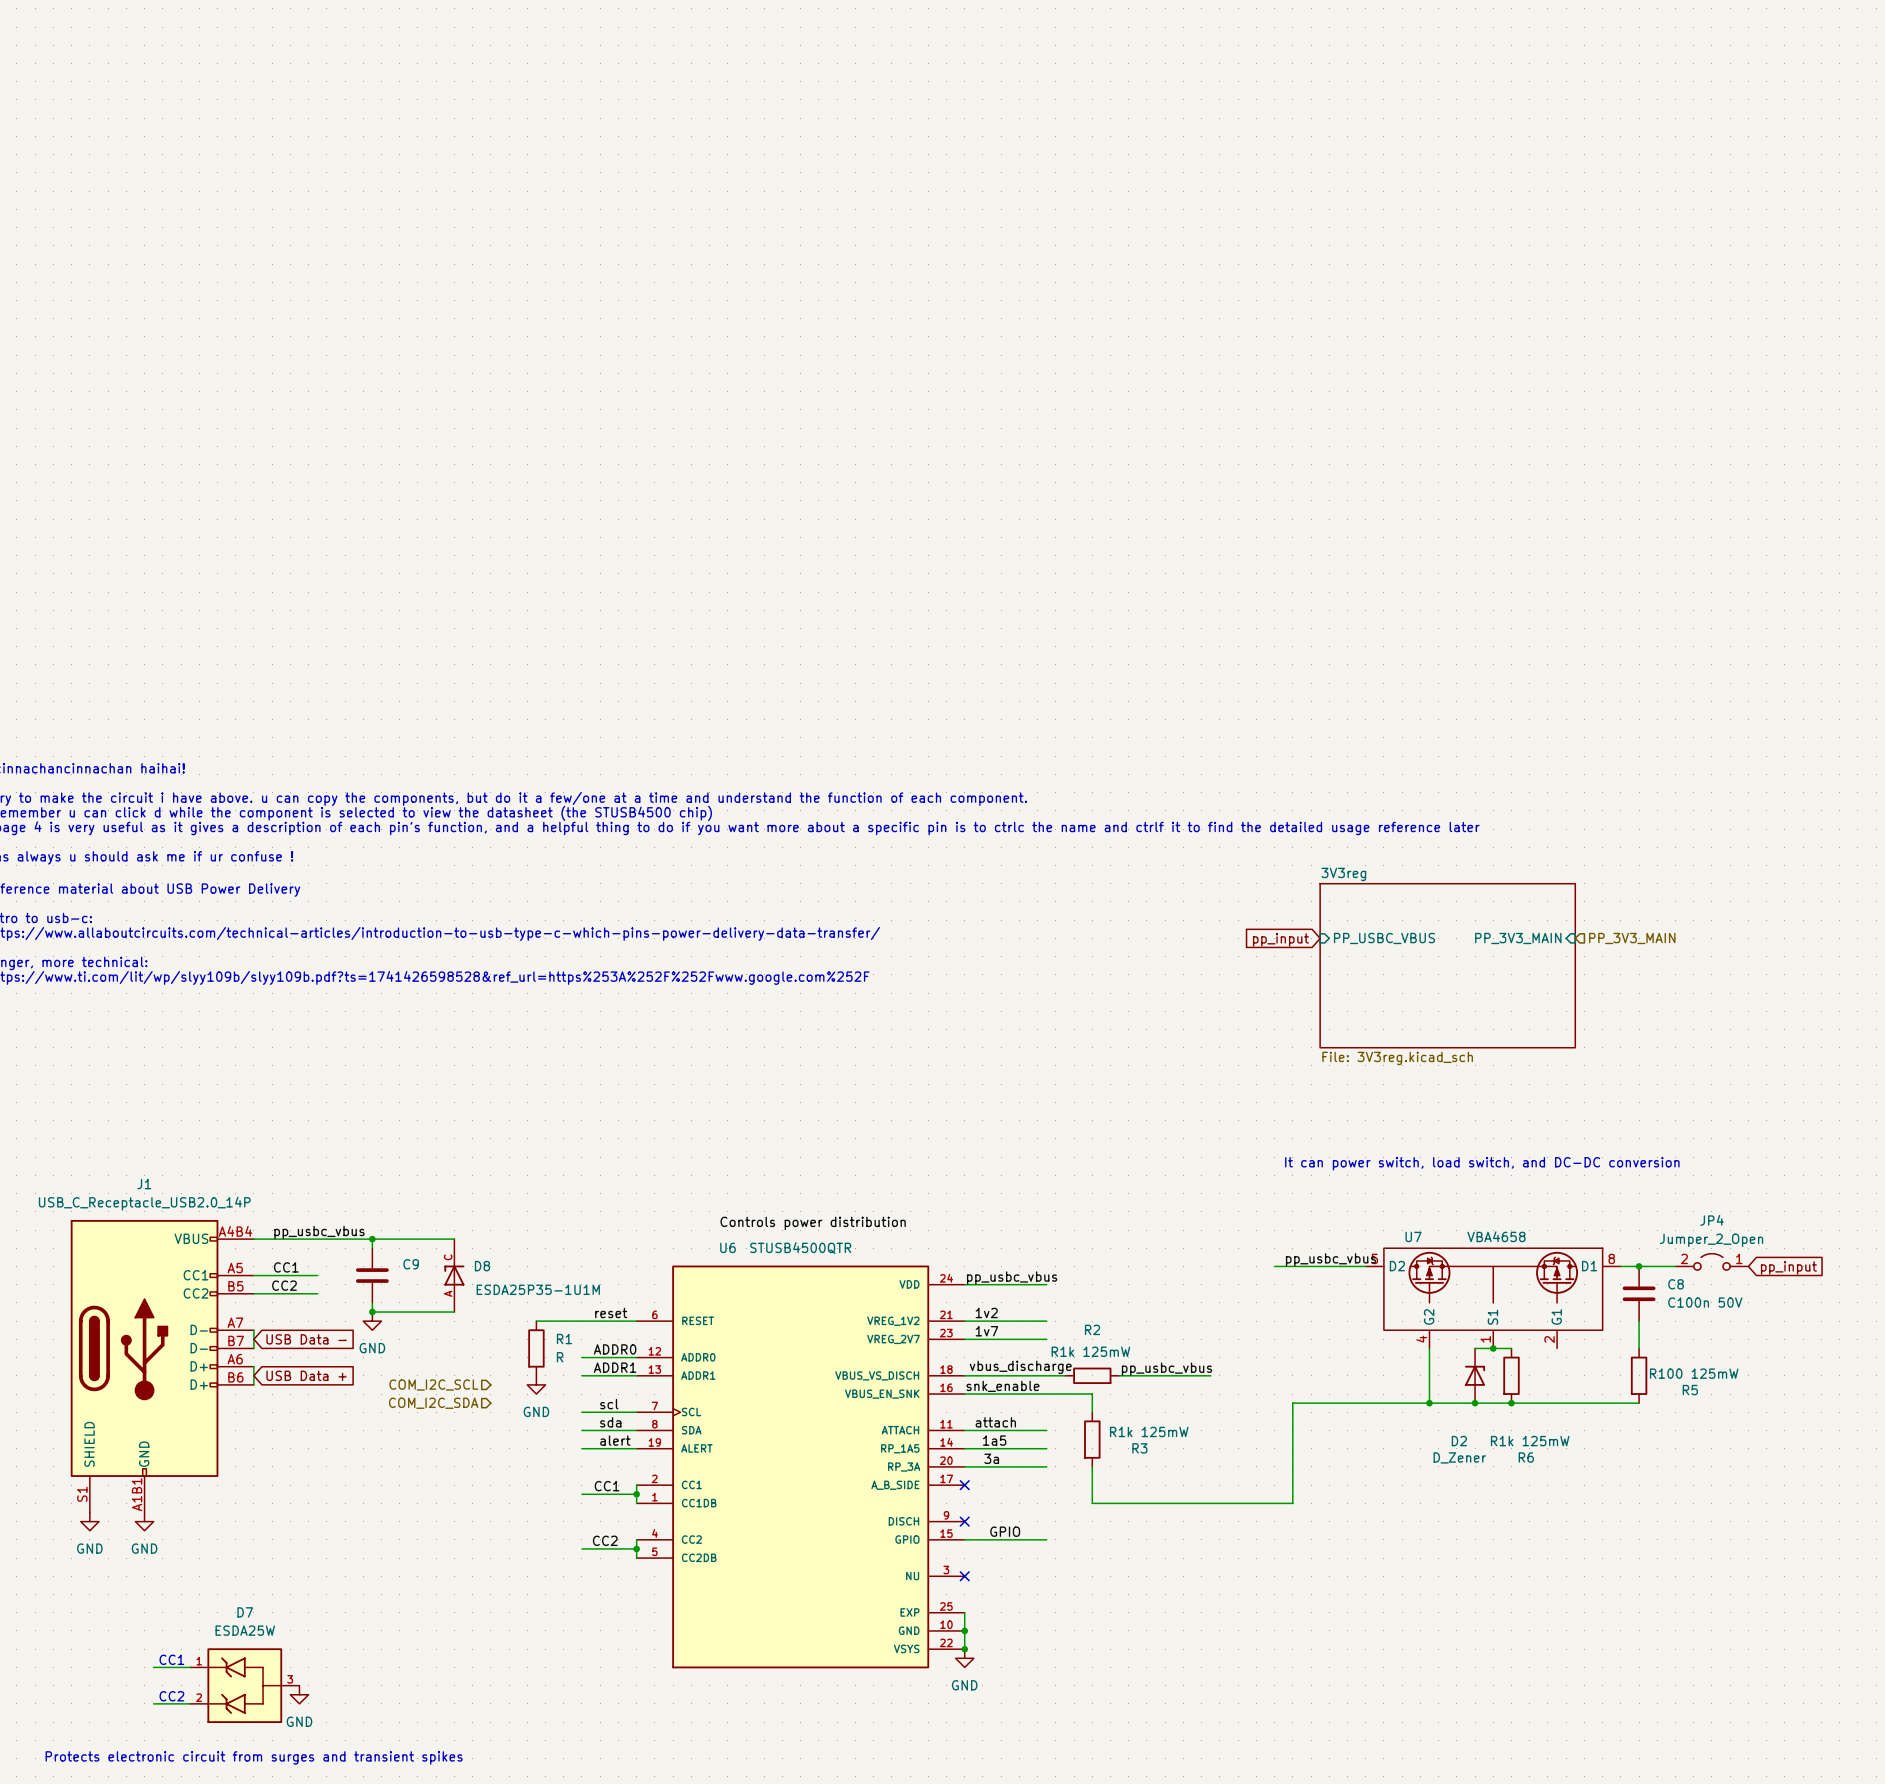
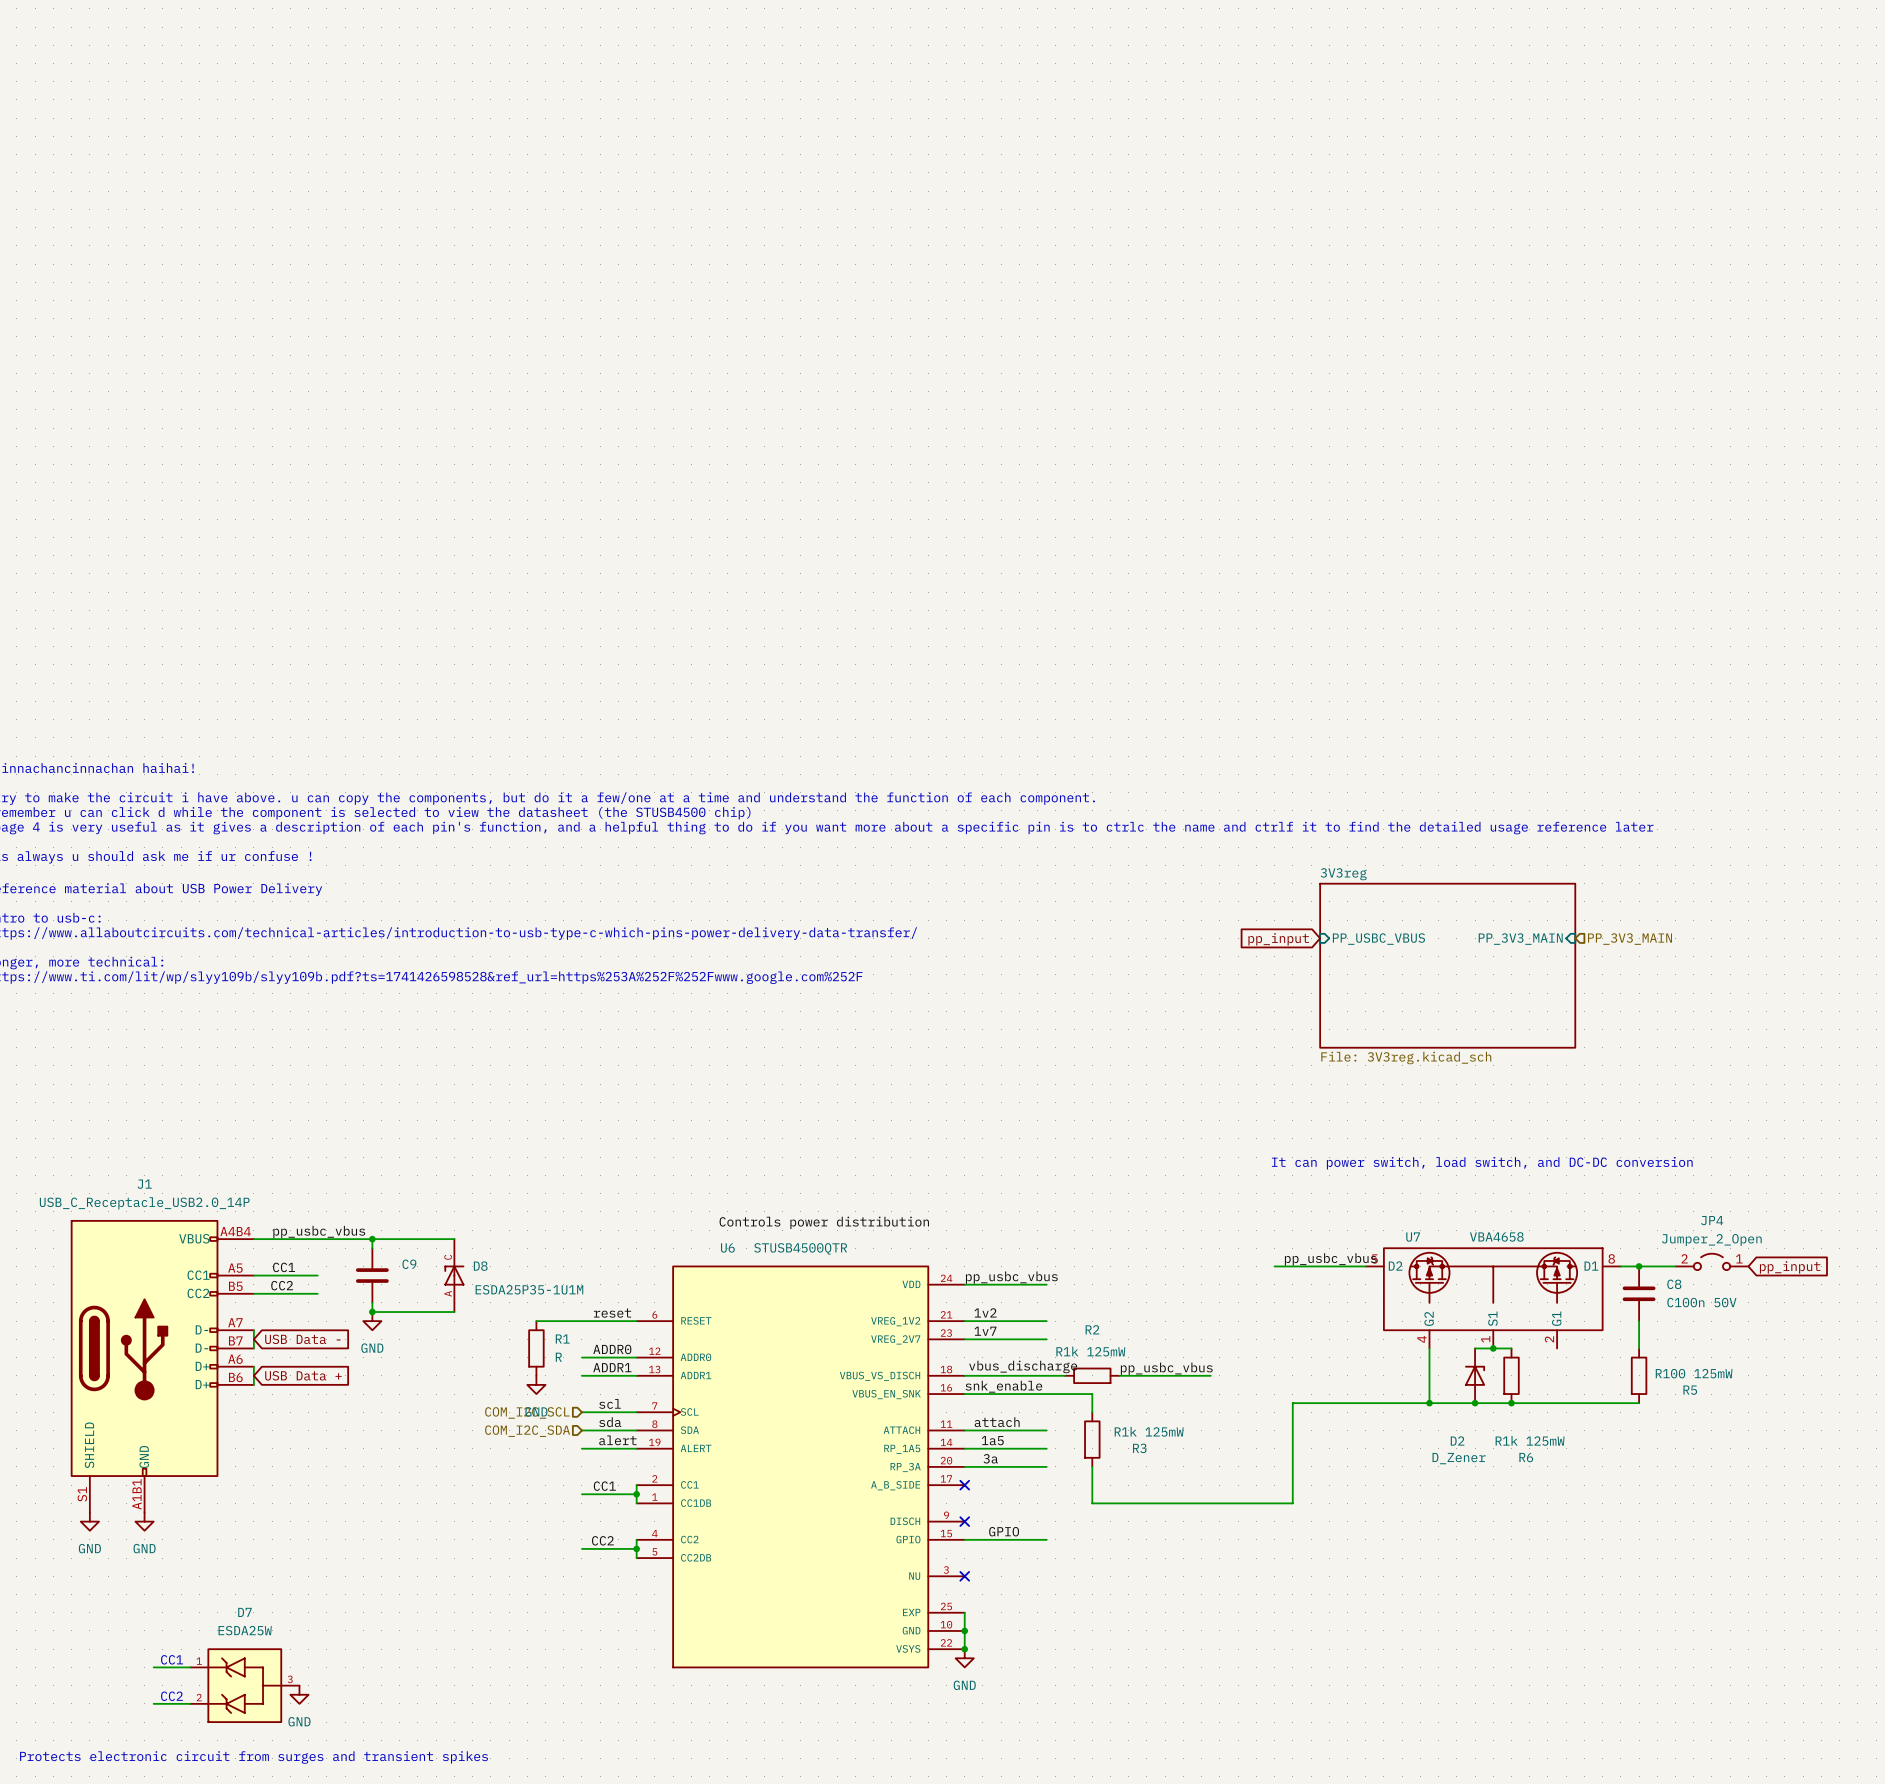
hierarchical label position: COM_I2C_SCL (433, 1385) -> COM_I2C_SCL (527, 1412)
hierarchical label position: COM_I2C_SDA (433, 1403) -> COM_I2C_SDA (527, 1431)

